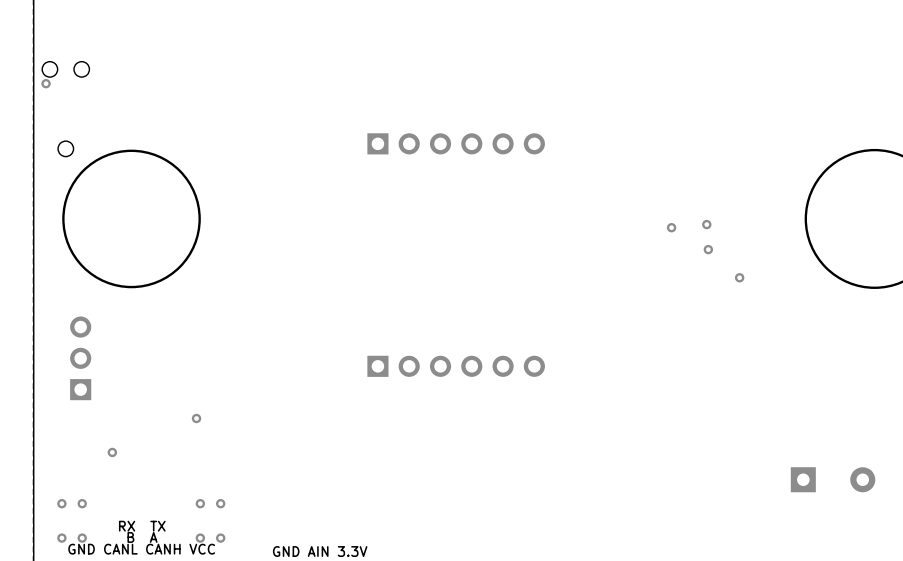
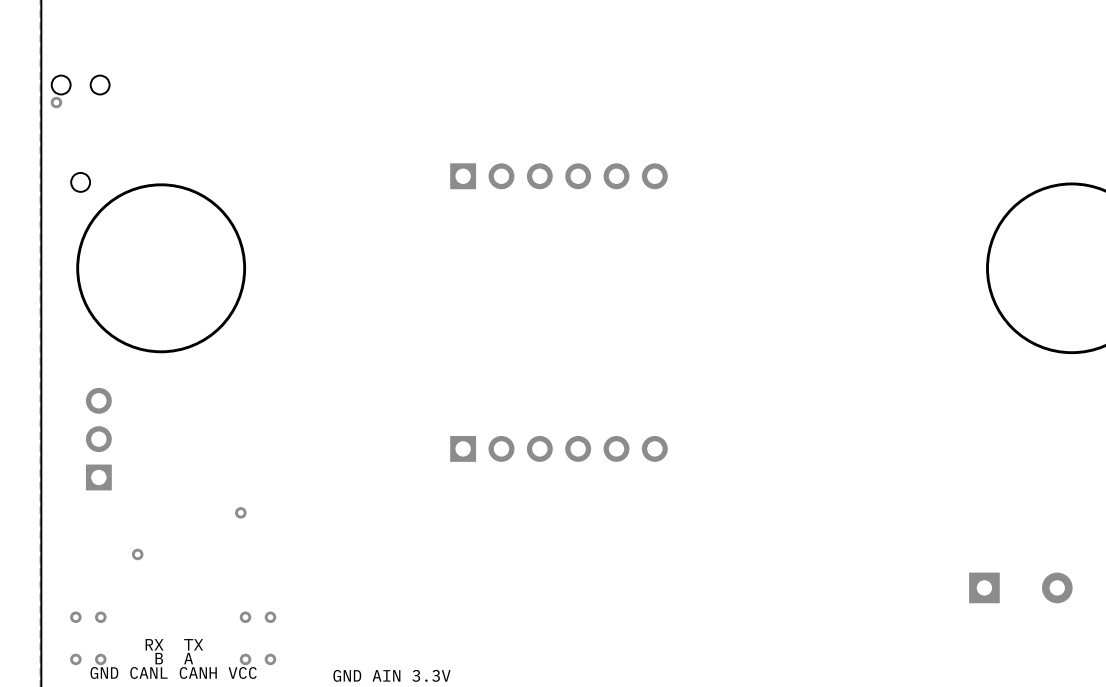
via: (706, 224) -> none
via: (671, 227) -> none
via: (708, 249) -> none
via: (739, 277) -> none

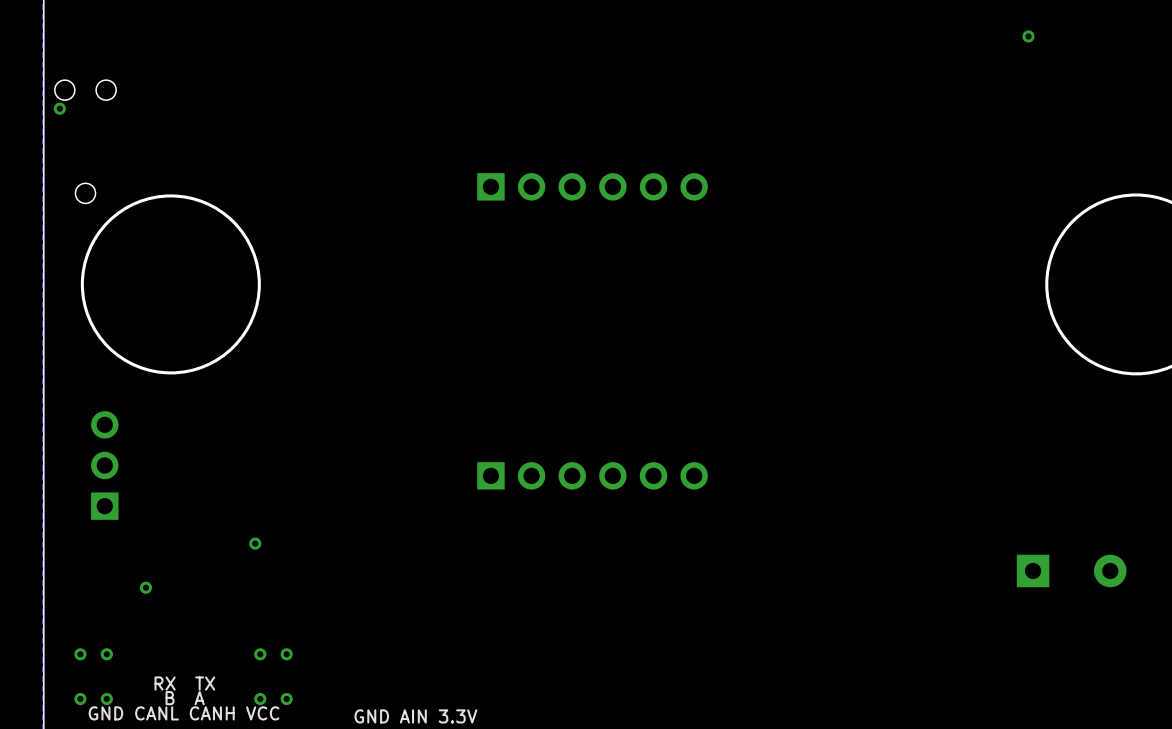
via: none -> (1028, 36)
part position: (1020, 587) -> (1071, 570)

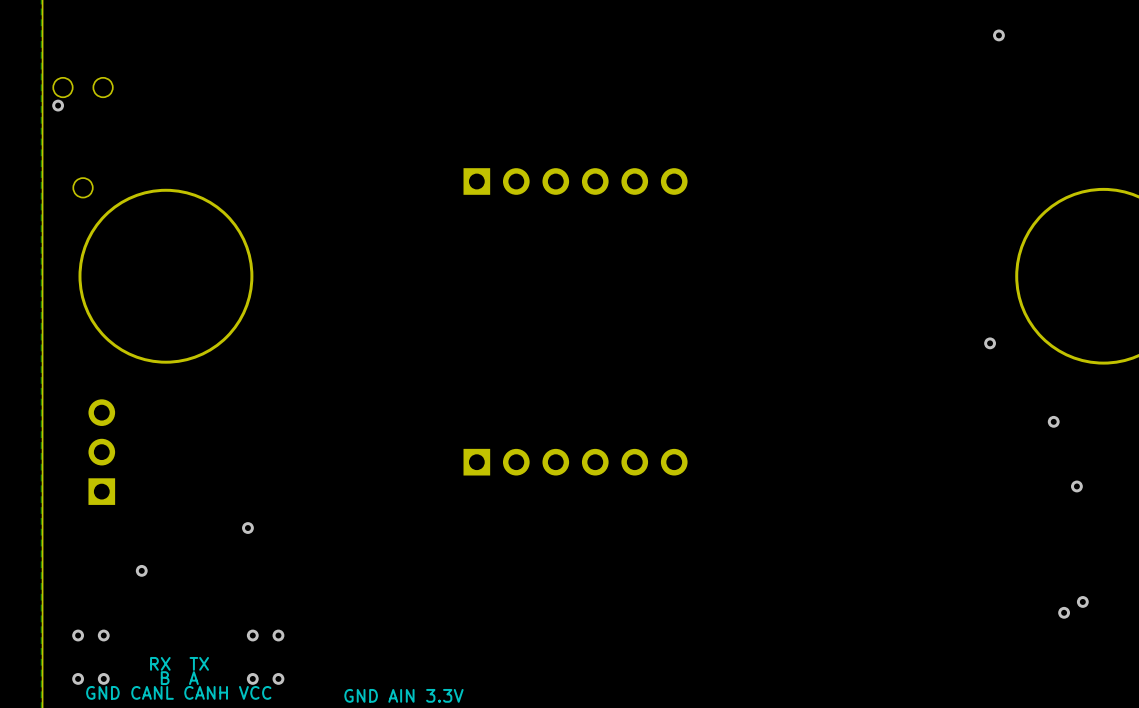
via: none -> (990, 343)
via: none -> (1053, 421)
via: none -> (1076, 486)
part: (1071, 570) -> none
via: none -> (1082, 601)
via: none -> (1064, 612)

